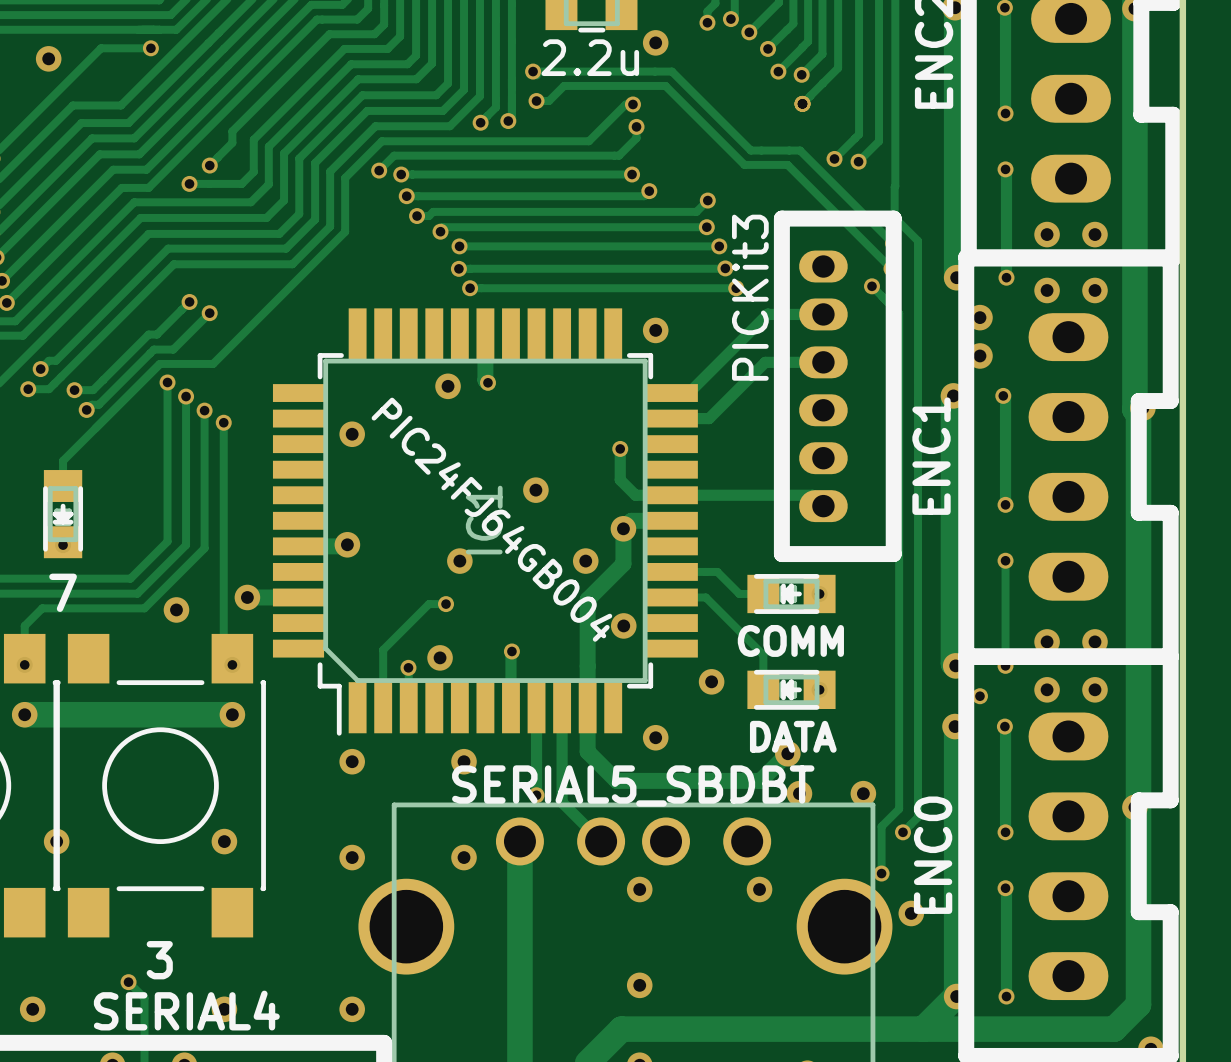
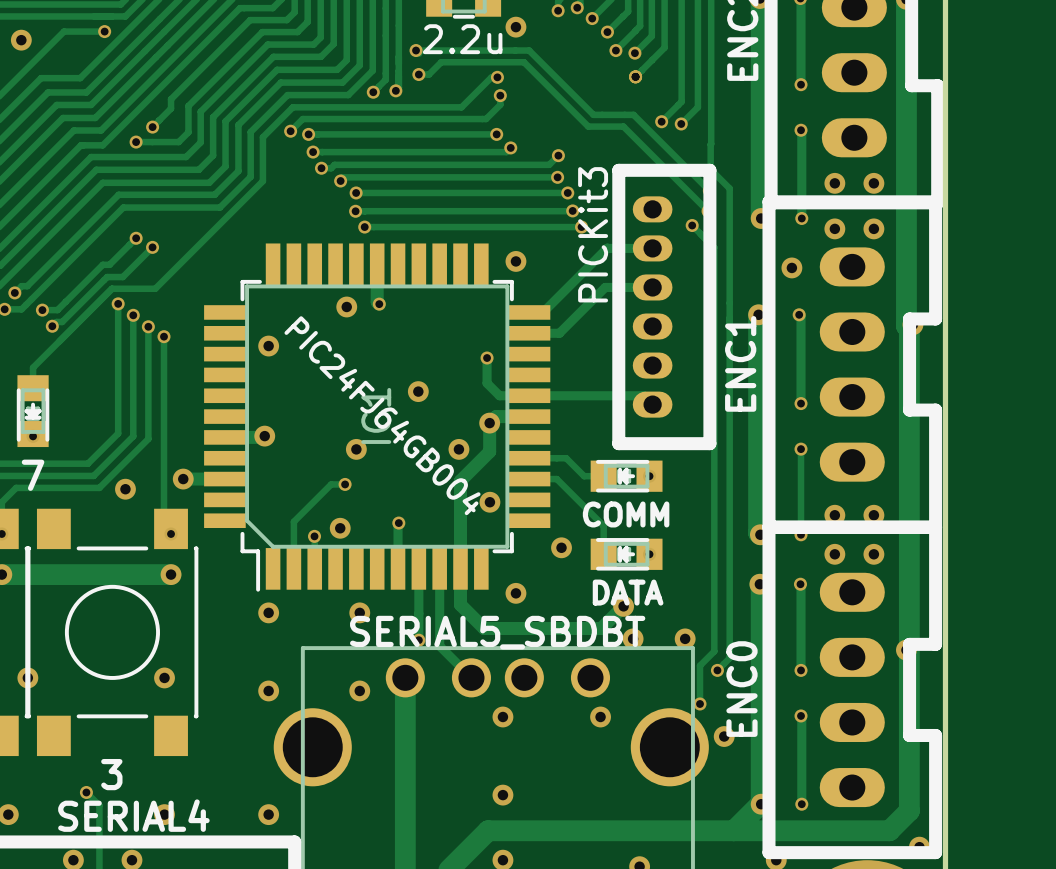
via: (979, 317) -> none
via: none -> (791, 267)
via: (979, 355) -> none
via: (979, 696) -> none

